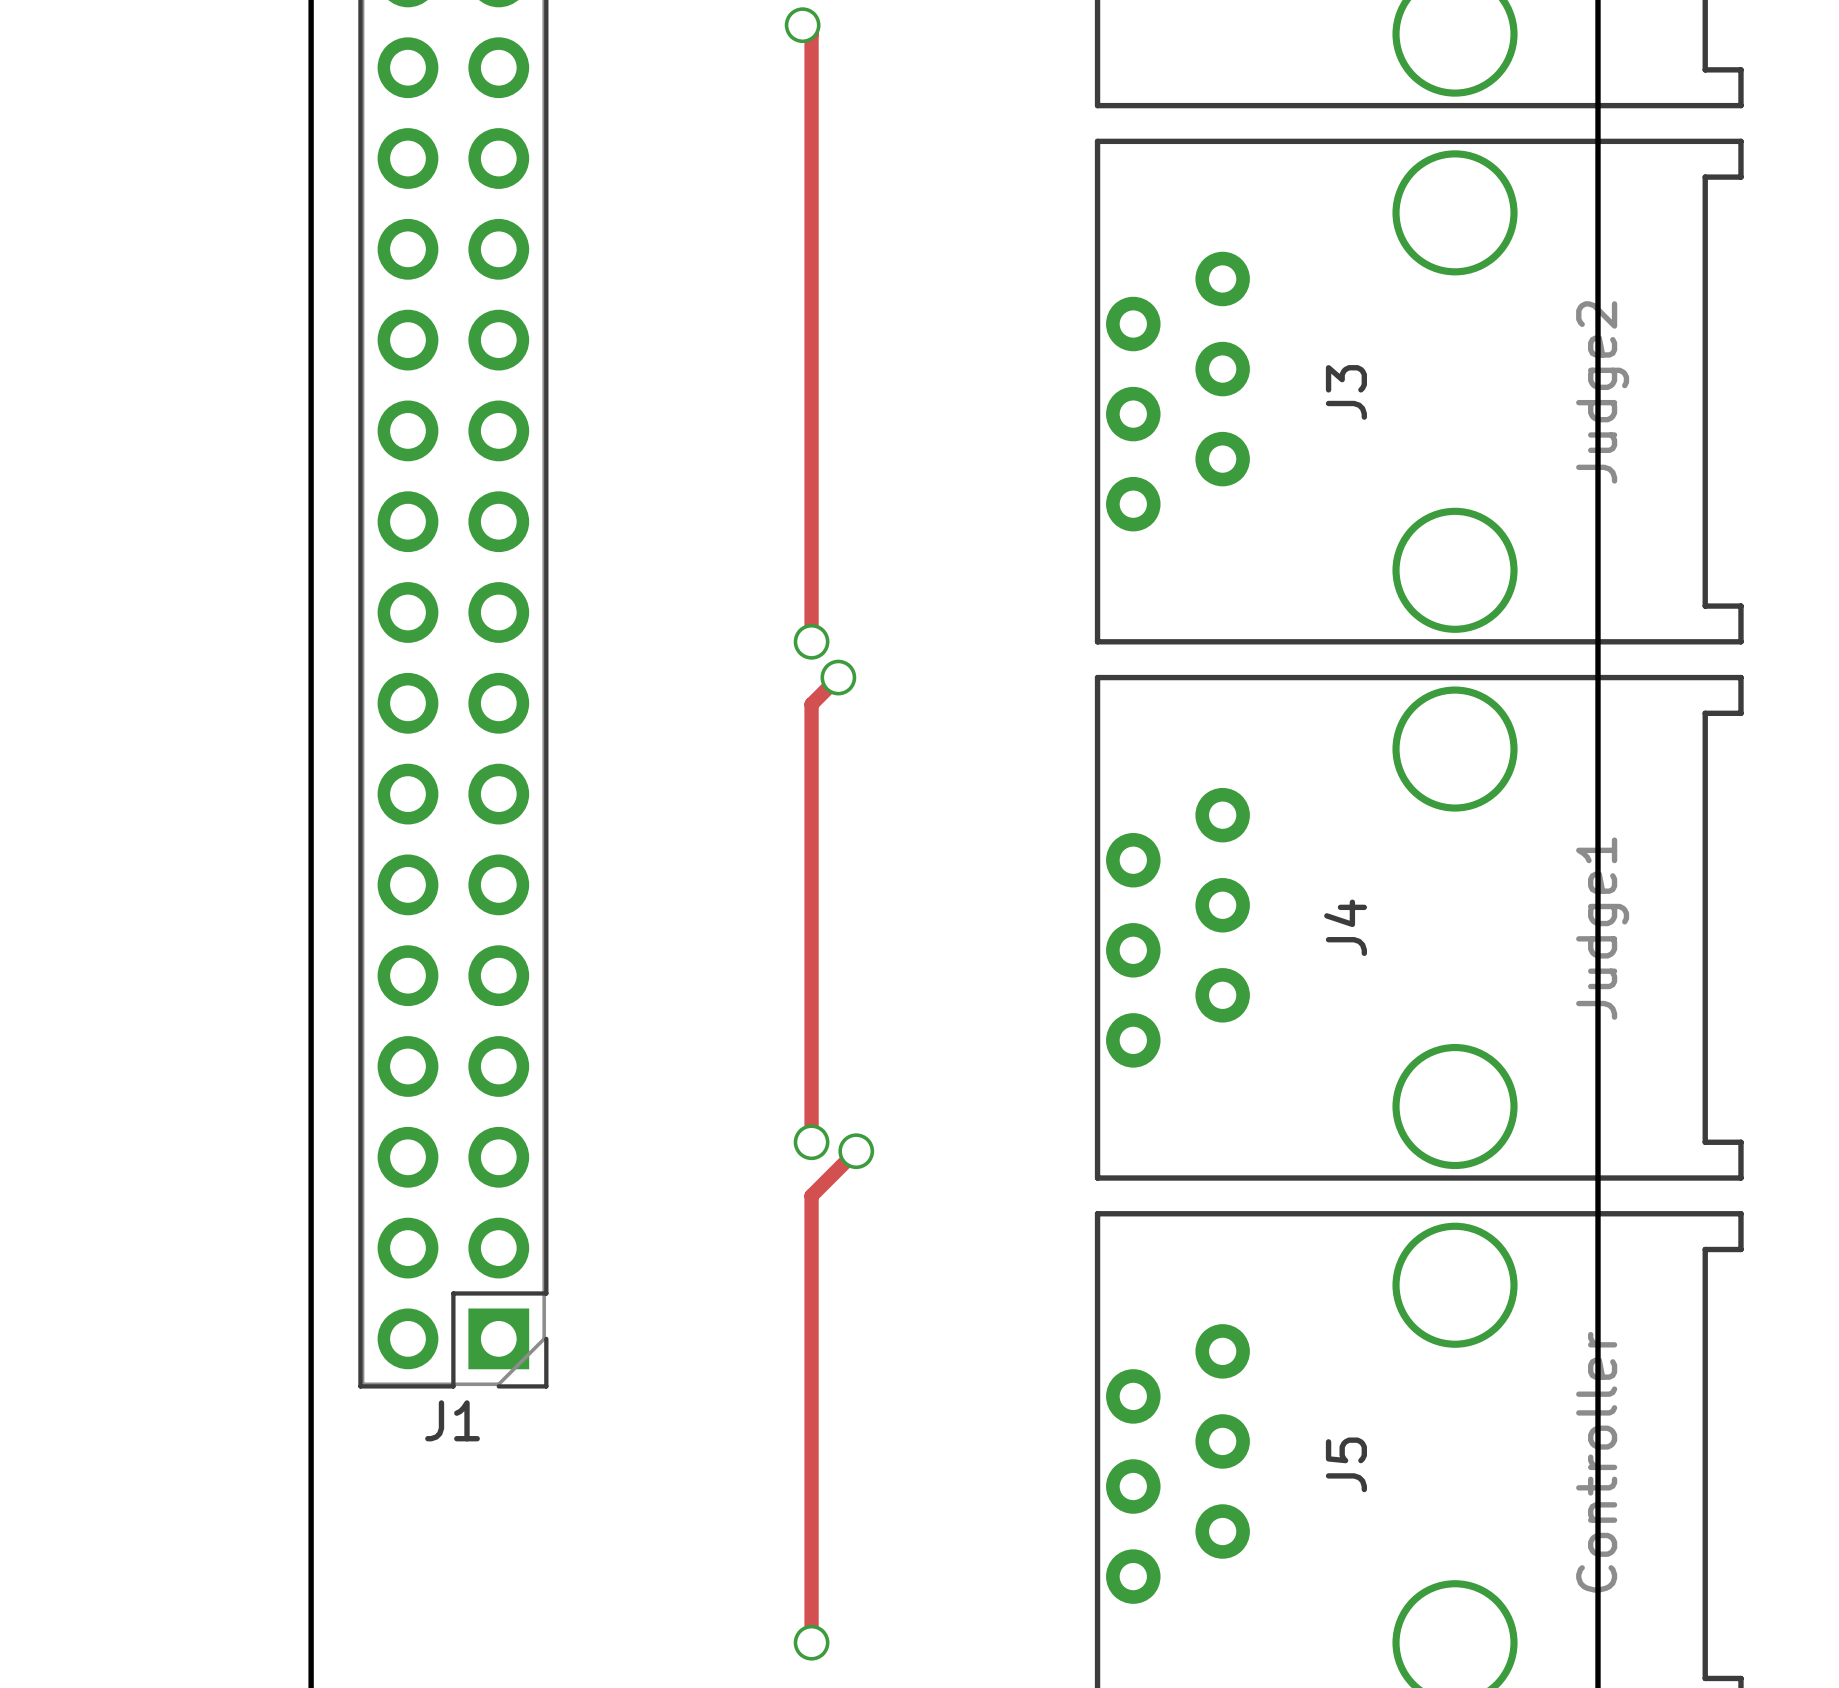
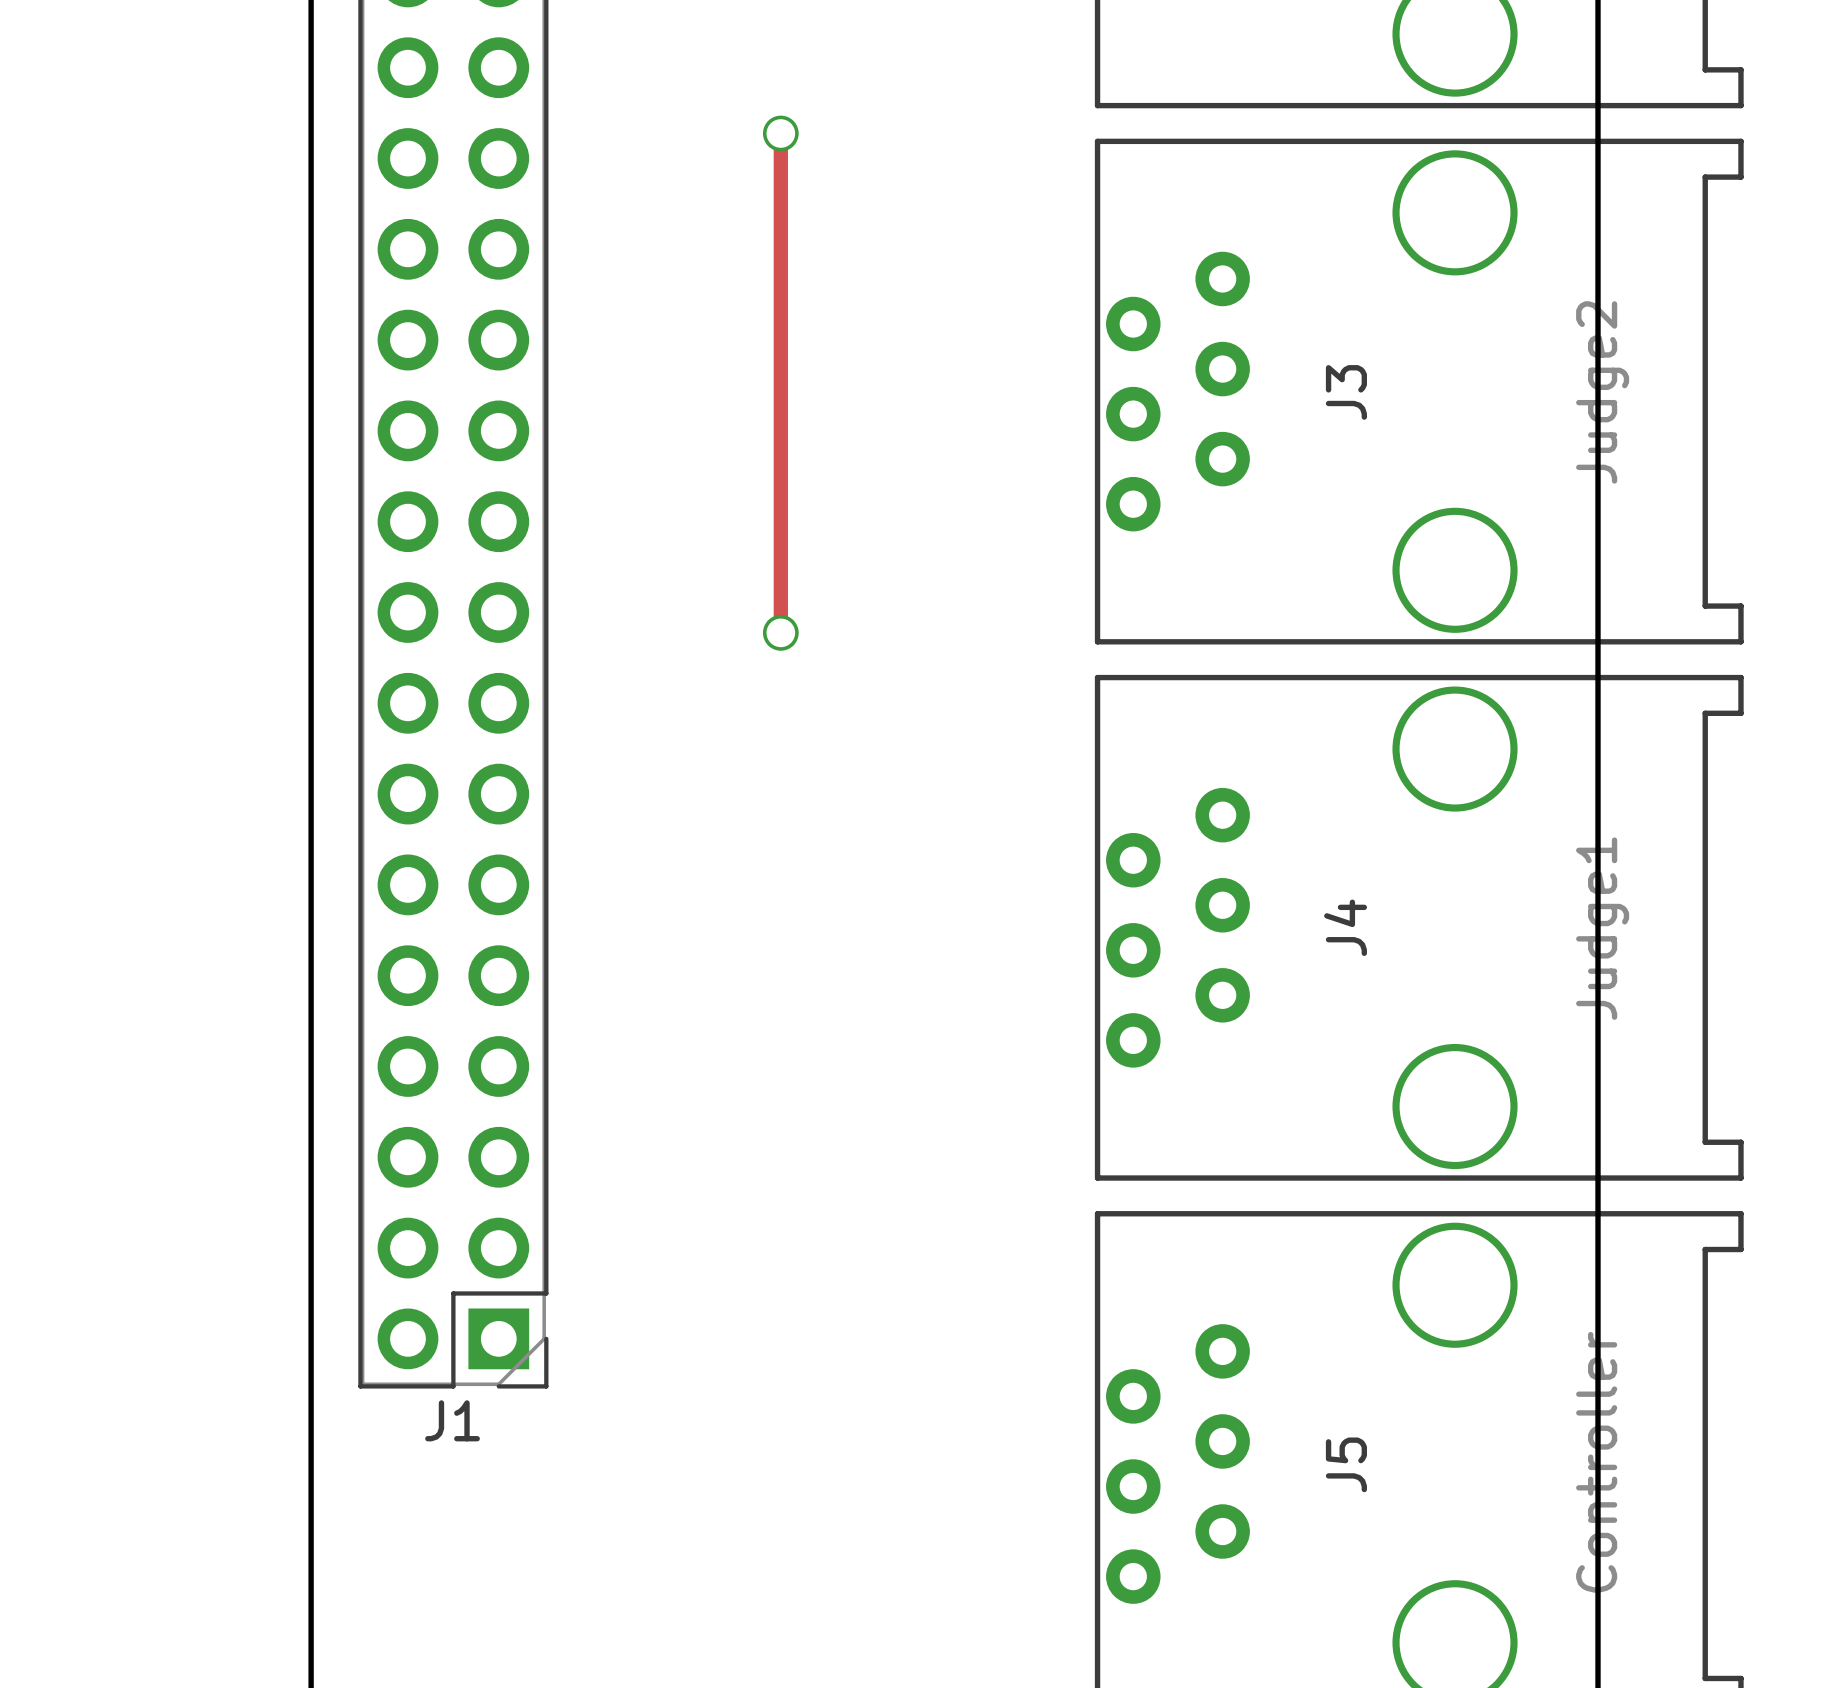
track: (802, 25) (811, 34) (811, 641) -> none
via position: (802, 25) -> (780, 133)
track: none -> (780, 133) (780, 632)
via position: (811, 641) -> (780, 632)
track: (838, 677) (811, 704) (811, 1142) -> none
via: (838, 677) -> none
via: (811, 1142) -> none
track: (856, 1151) (811, 1195) (811, 1642) -> none
via: (856, 1151) -> none
via: (811, 1642) -> none

